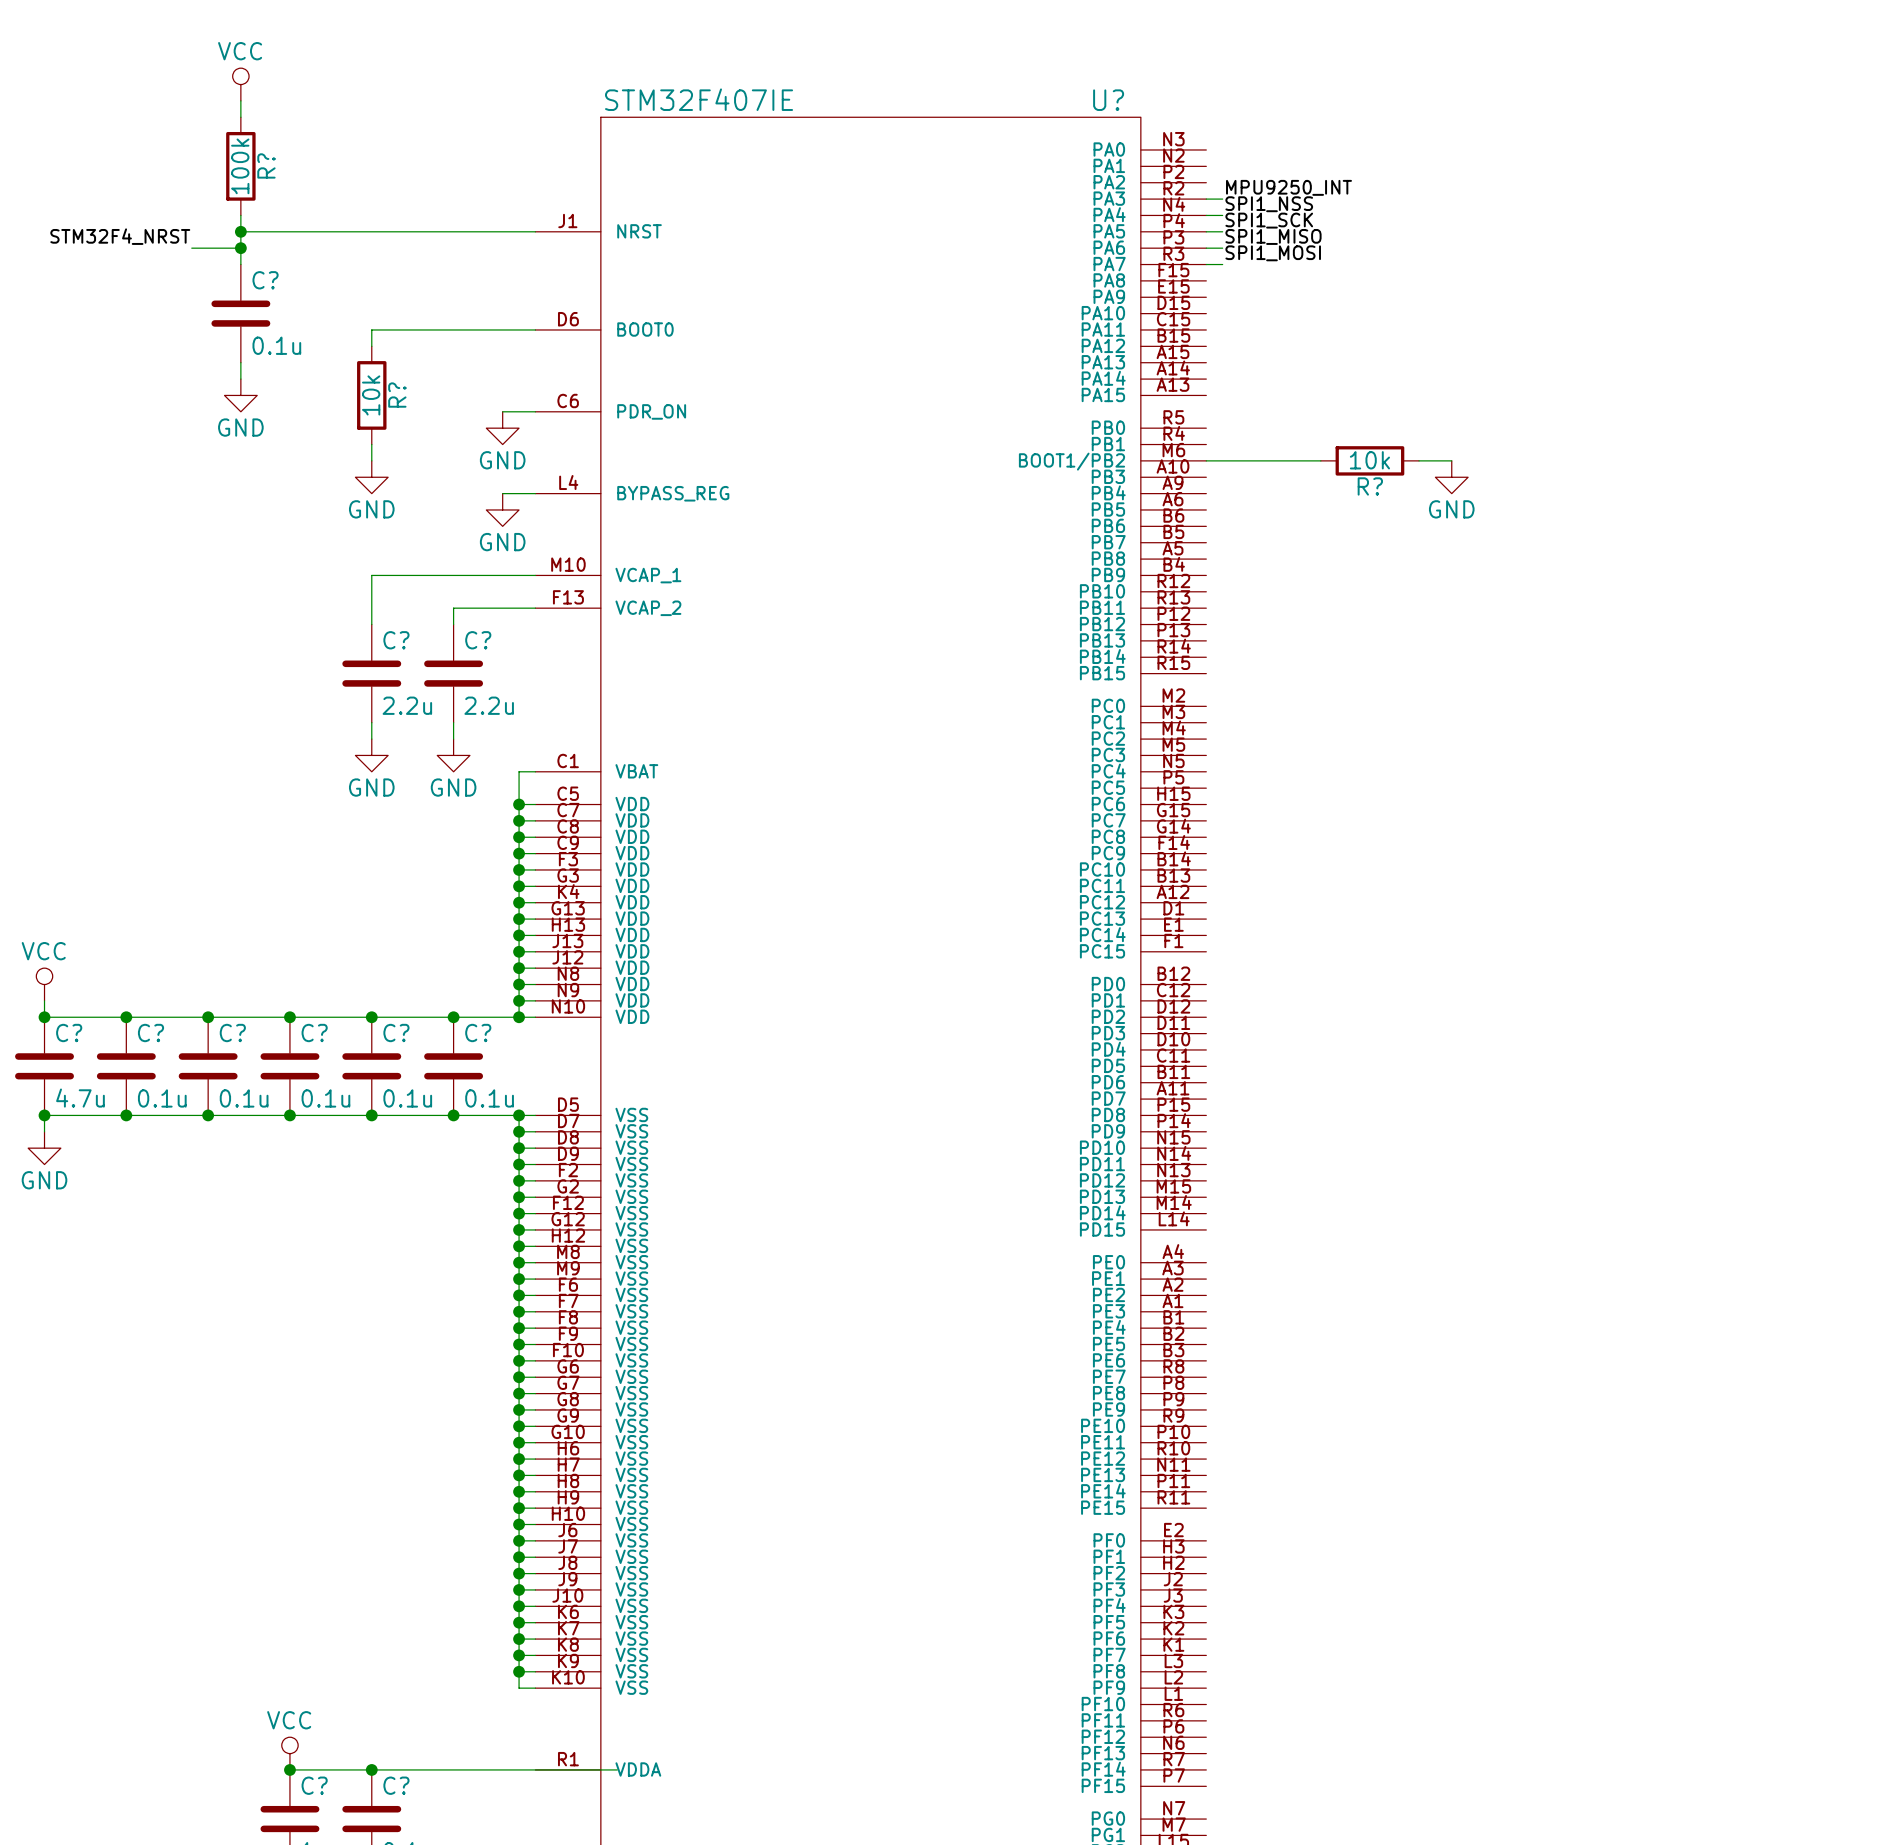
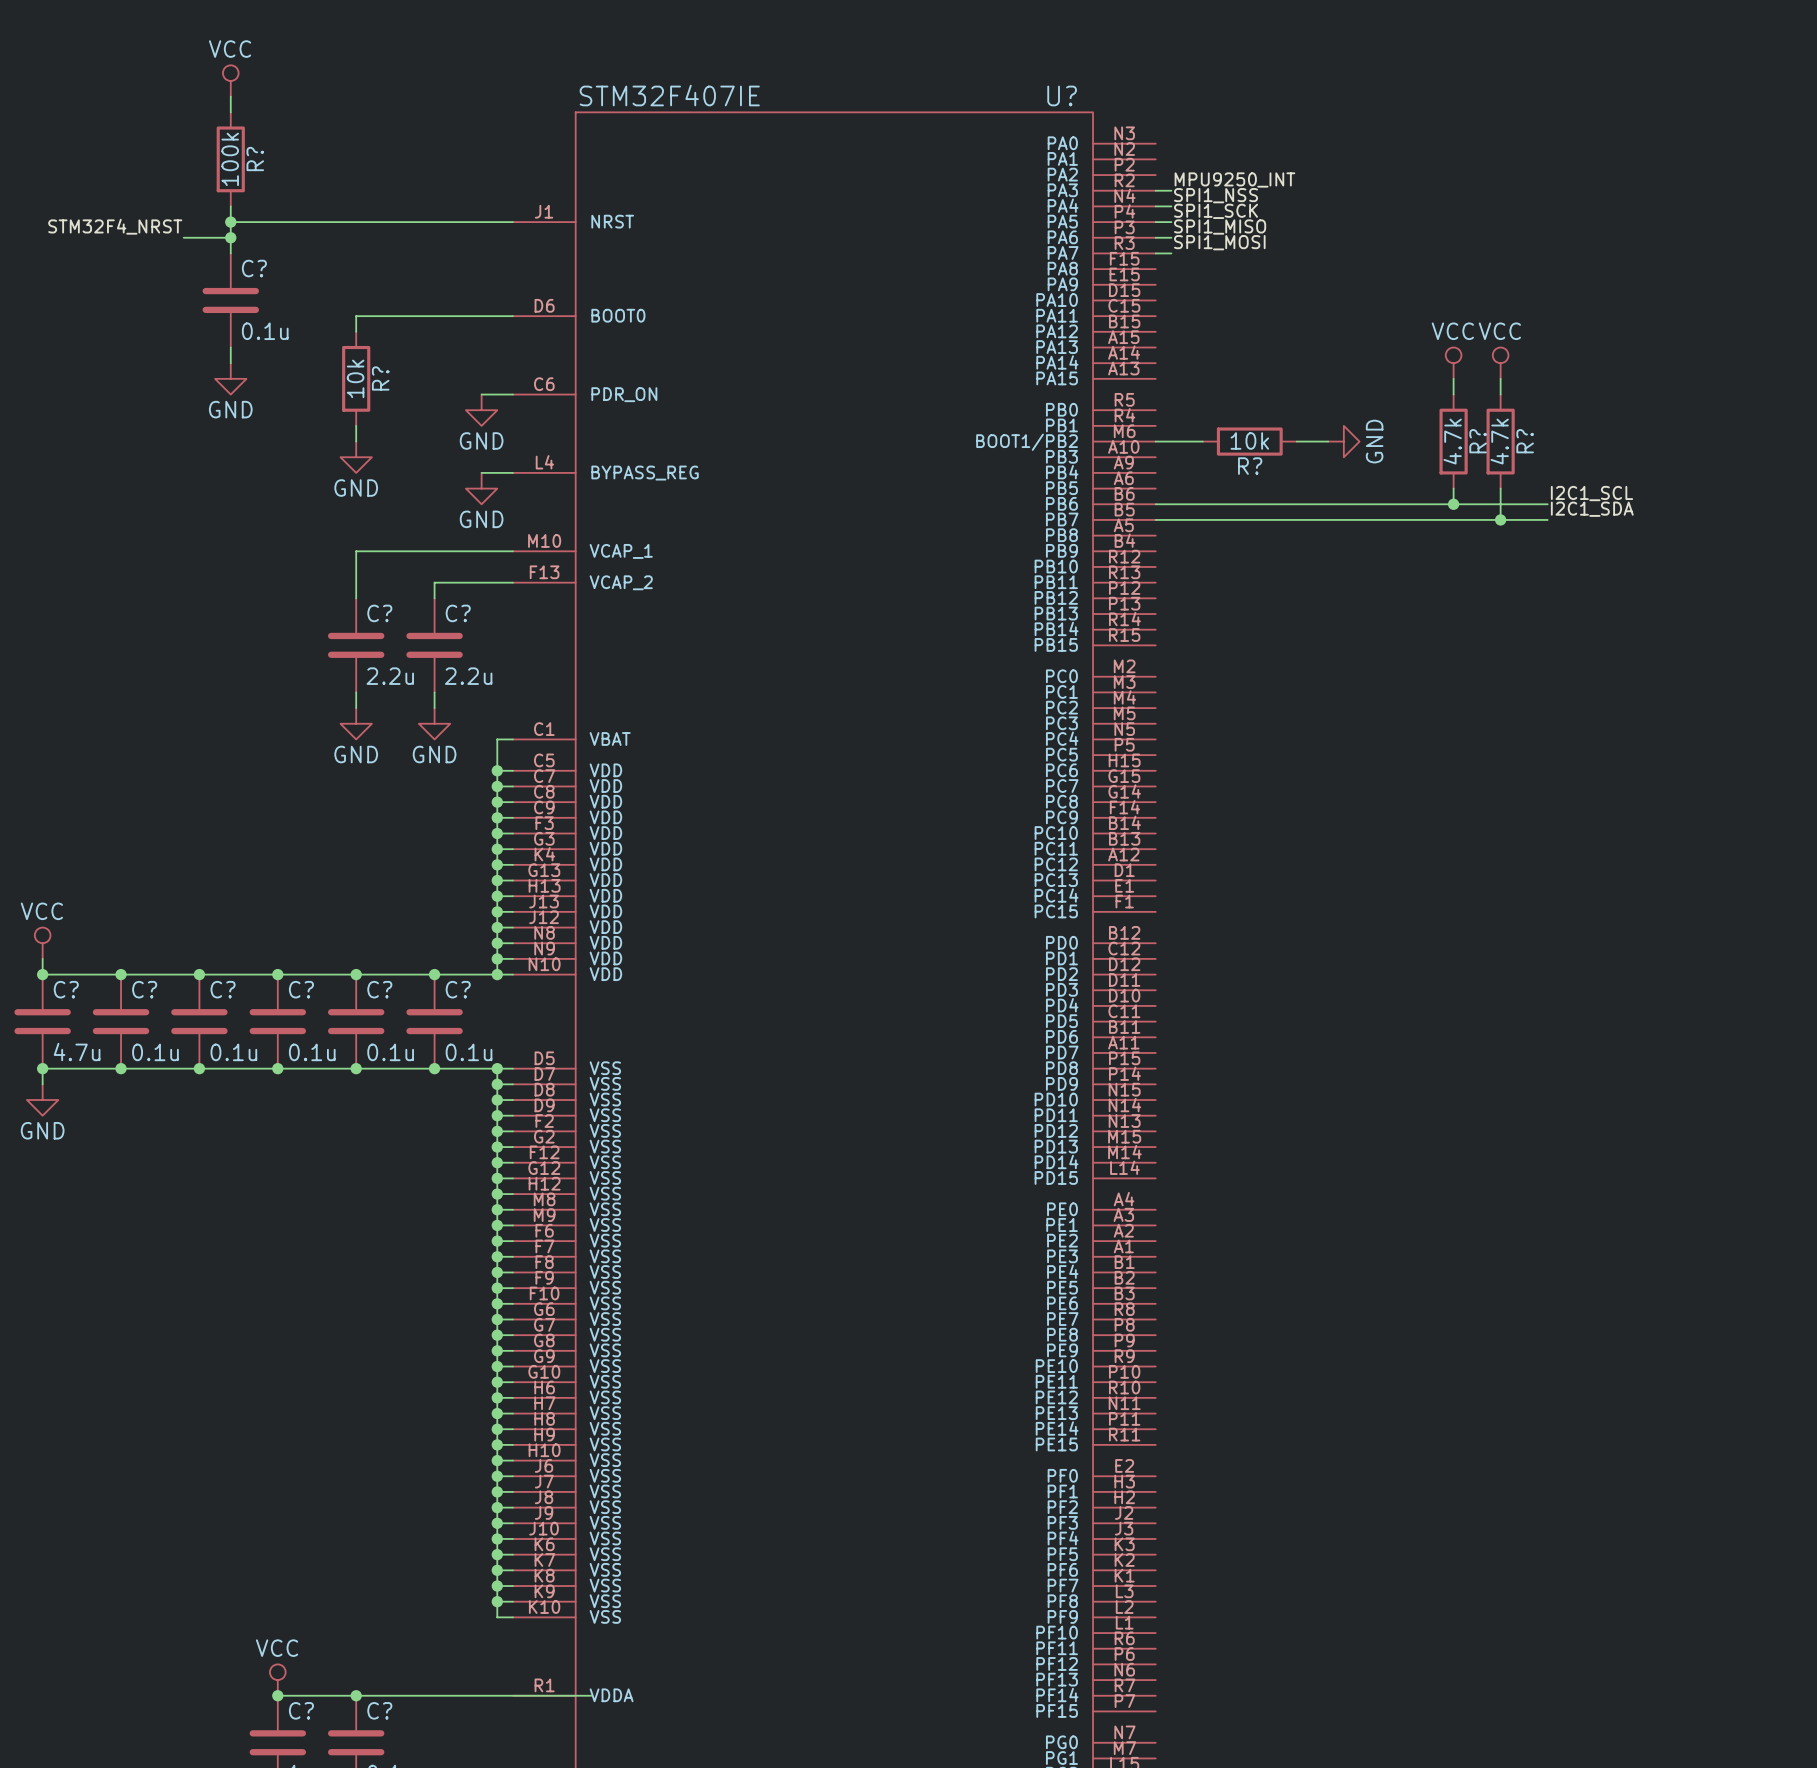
power symbol: none -> VCC (1453, 363)
power symbol: none -> VCC (1500, 363)
wire: none -> (1453, 378) (1453, 394)
wire: none -> (1500, 378) (1500, 394)
wire: (1255, 460) (1320, 460) -> none
R? position: (1369, 460) -> (1249, 441)
wire: (1419, 460) (1451, 460) -> (1296, 441) (1328, 441)
R?: none -> 4.7k (1453, 441)
R?: none -> 4.7k (1500, 441)
power symbol rotation: 0° (1451, 477) -> 90° counterclockwise (1343, 441)
power symbol position: GND (1451, 477) -> GND (1343, 441)
wire: none -> (1453, 488) (1453, 504)
wire: none -> (1500, 488) (1500, 519)
label: none -> I2C1_SCL (1591, 493)
wire: none -> (1155, 504) (1547, 504)
junction: none -> (1453, 504)
label: none -> I2C1_SDA (1592, 509)
wire: none -> (1155, 519) (1547, 519)
junction: none -> (1500, 519)

